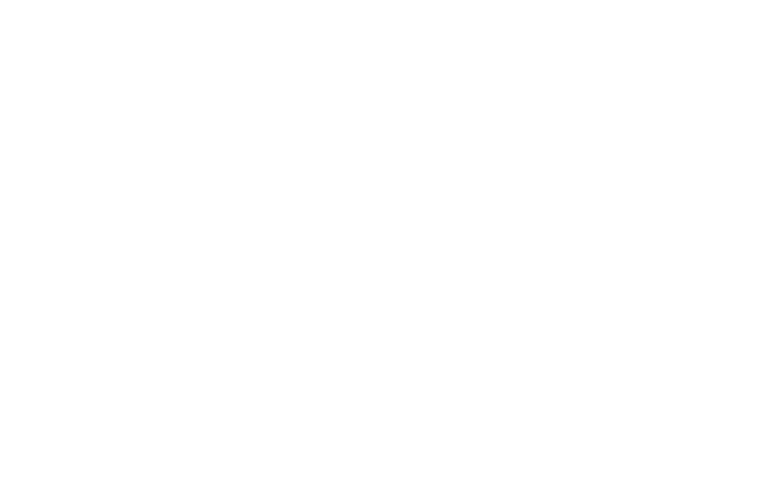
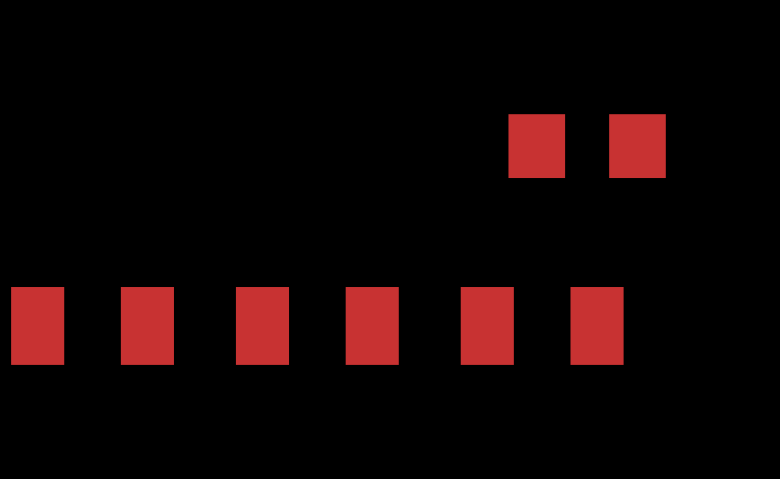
part: none -> (587, 146)
part: none -> (92, 325)
part: none -> (317, 325)
part: none -> (542, 325)

